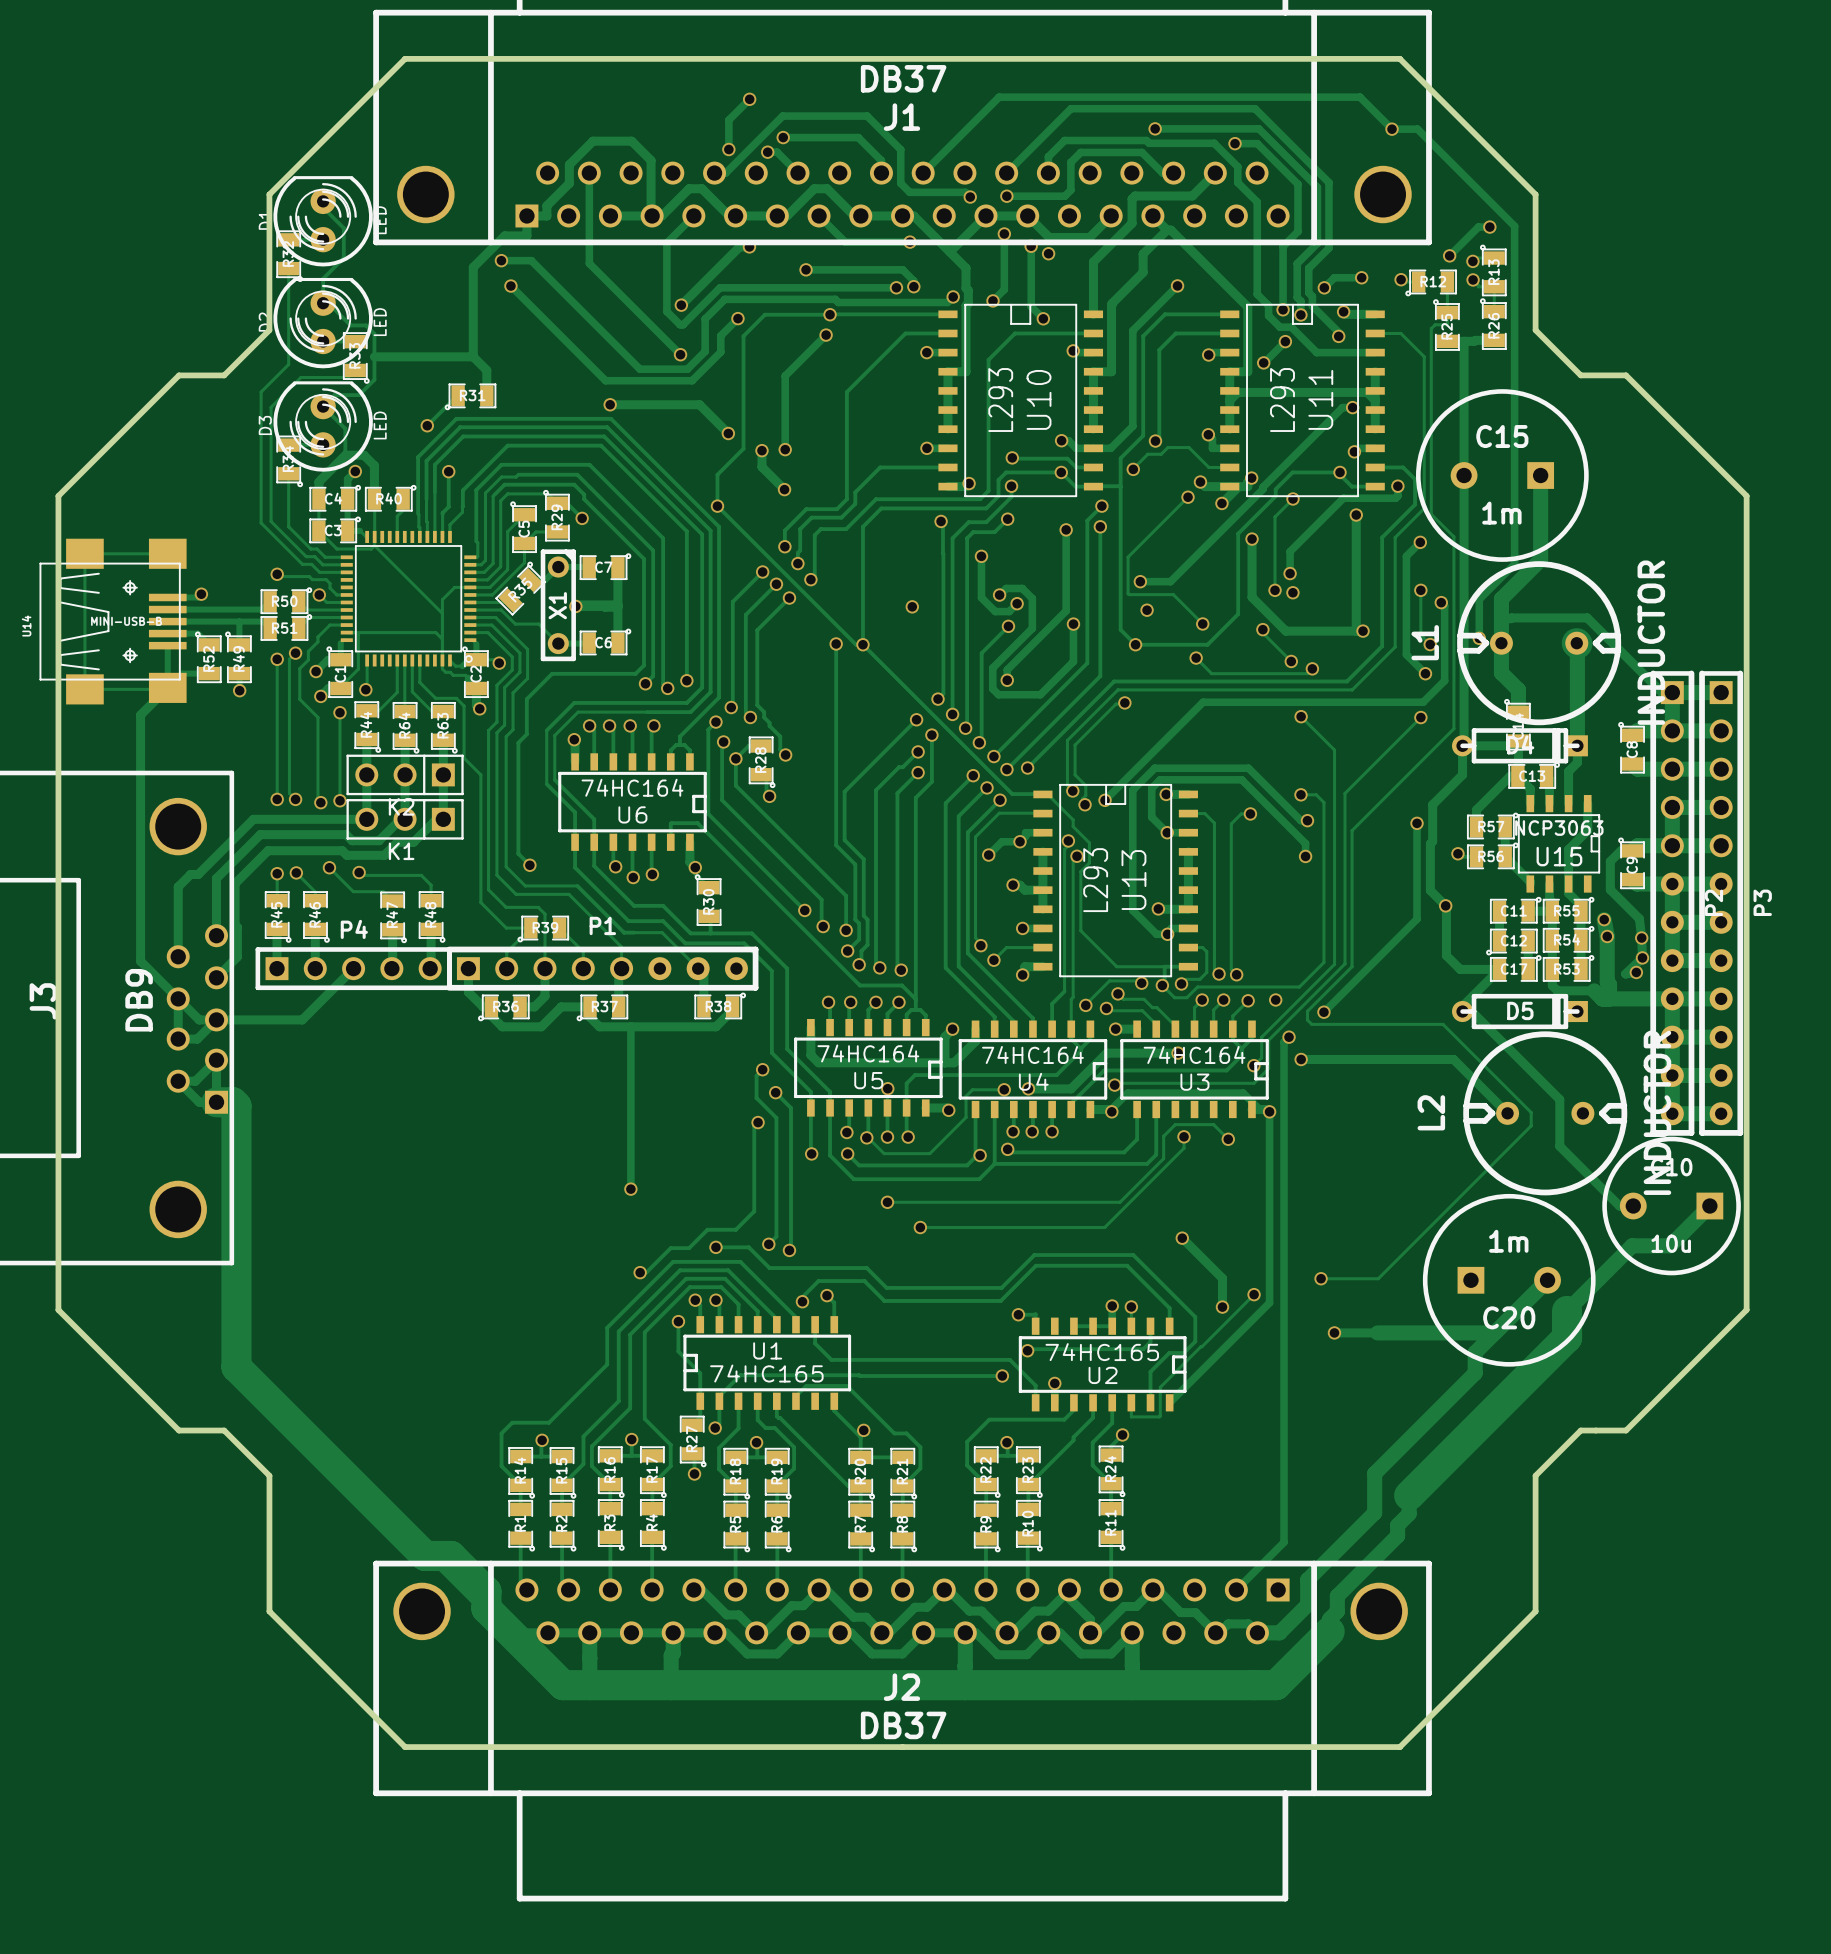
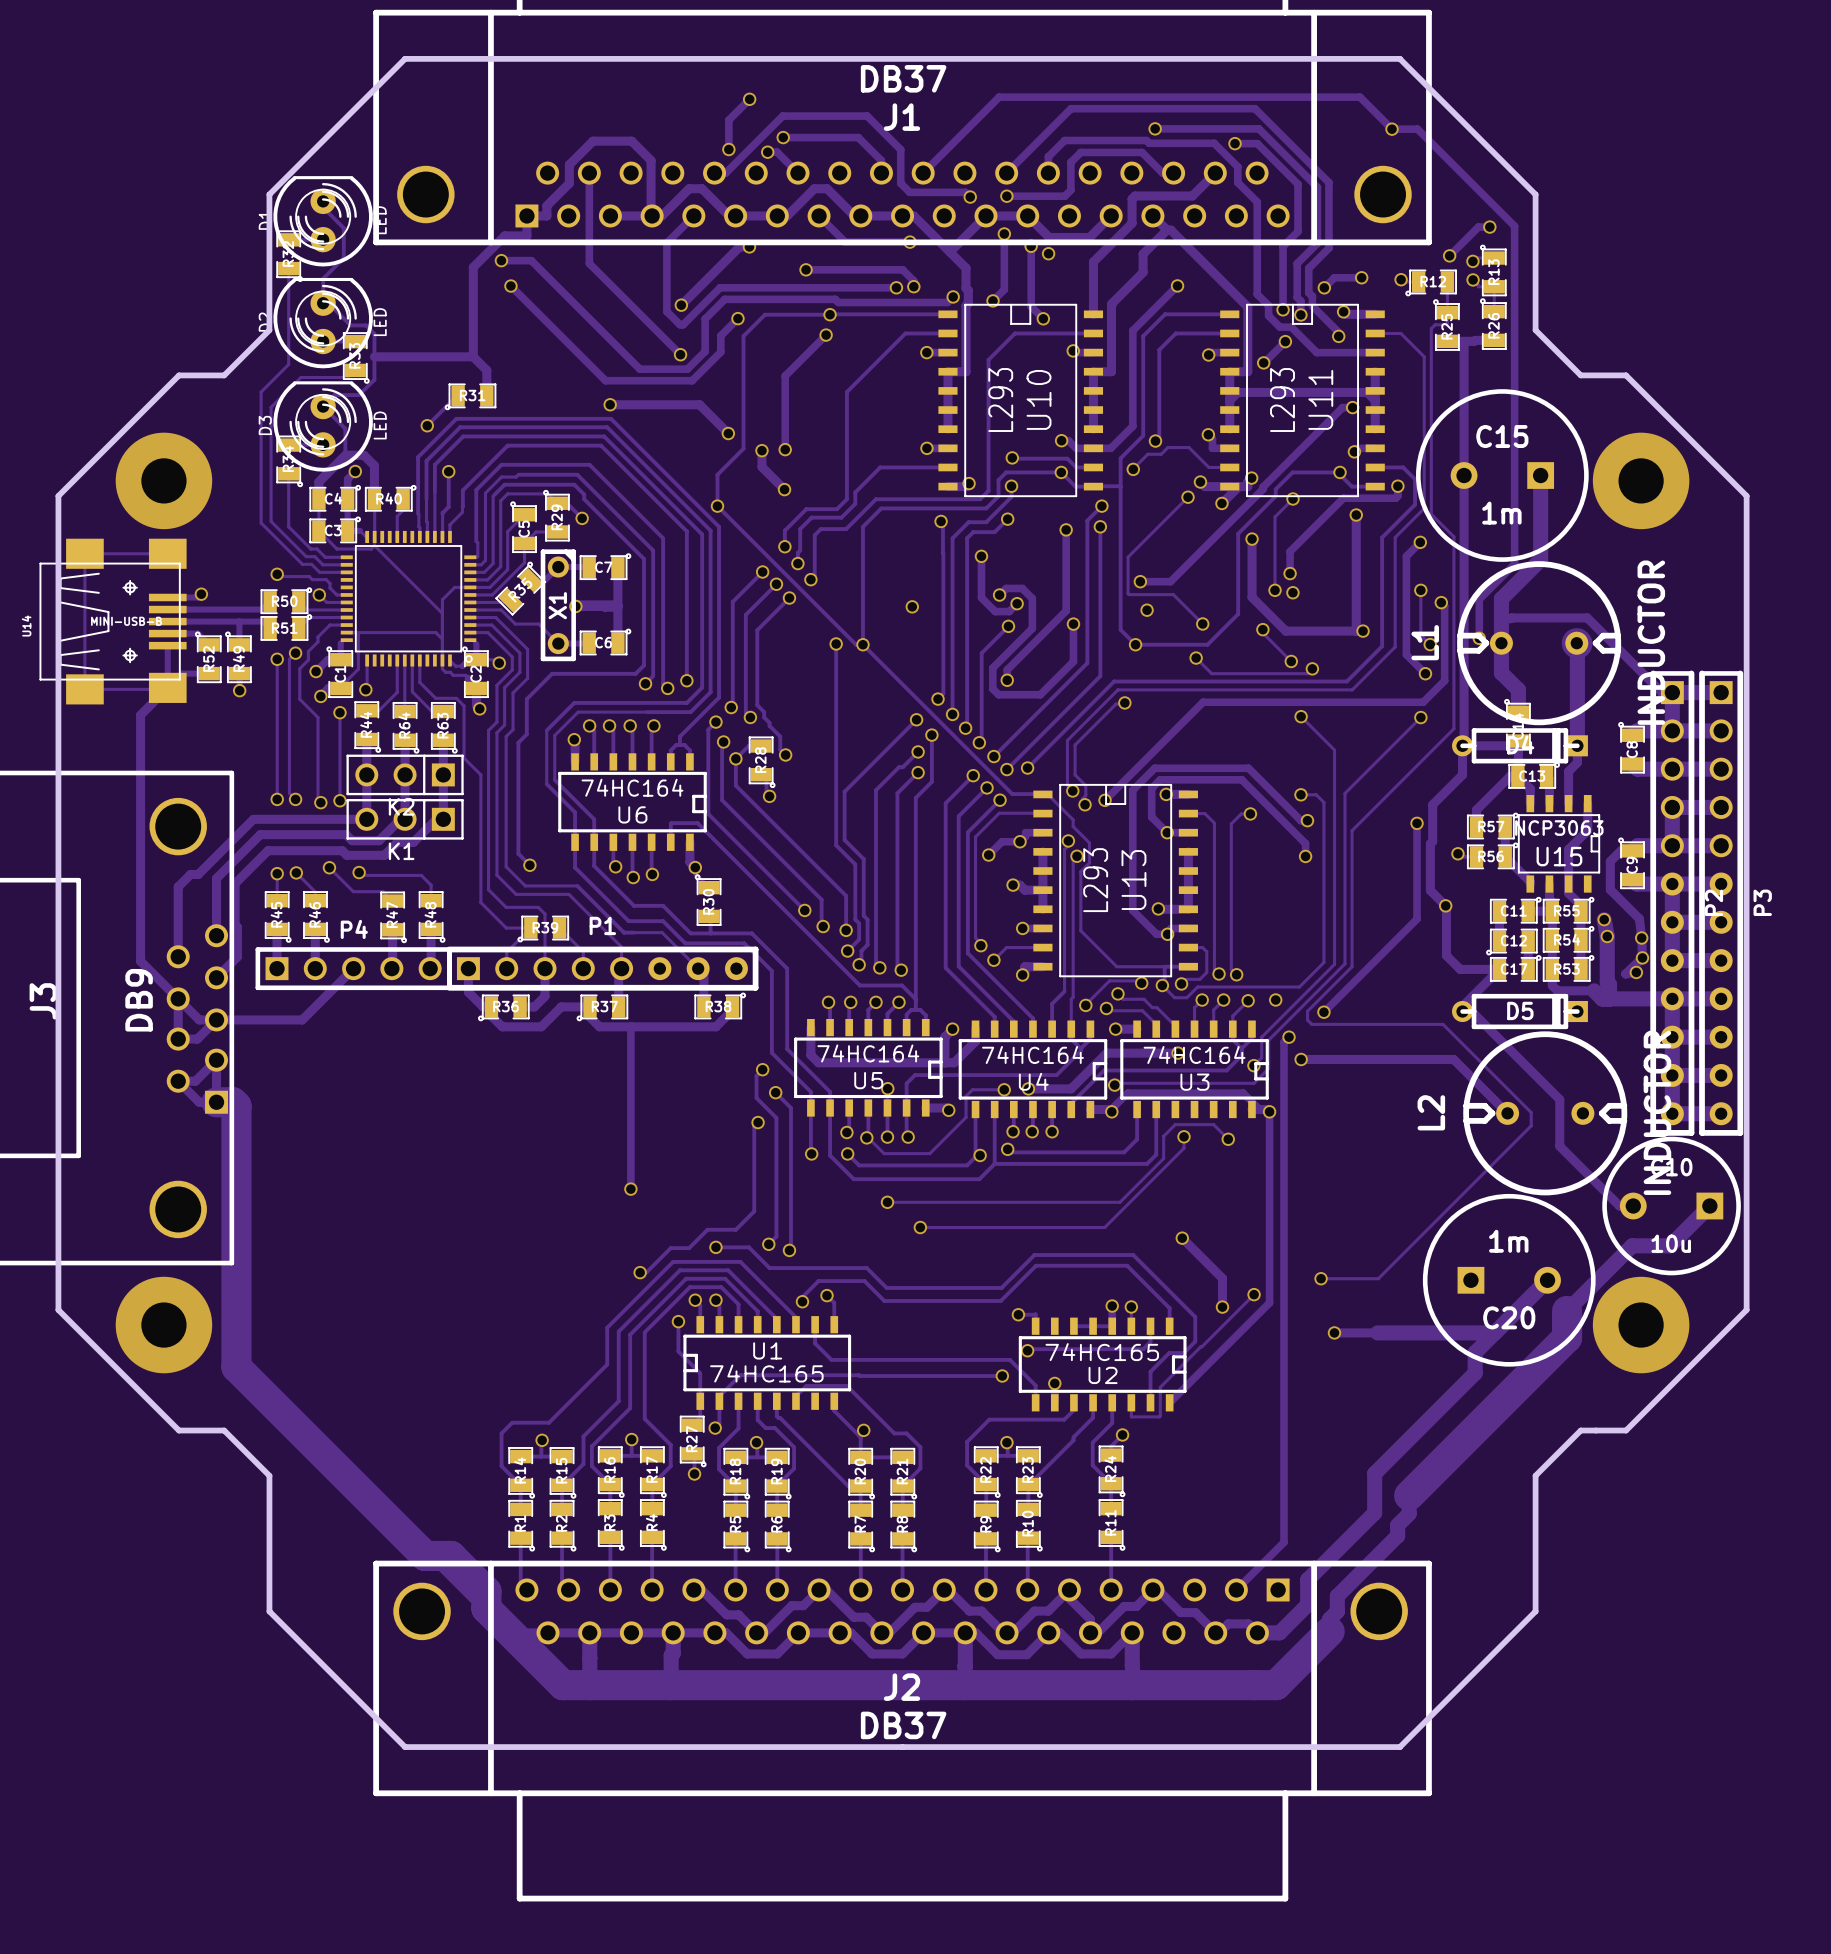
via: none -> (163, 480)
via: none -> (1641, 480)
via: none -> (163, 1325)
via: none -> (1641, 1325)

